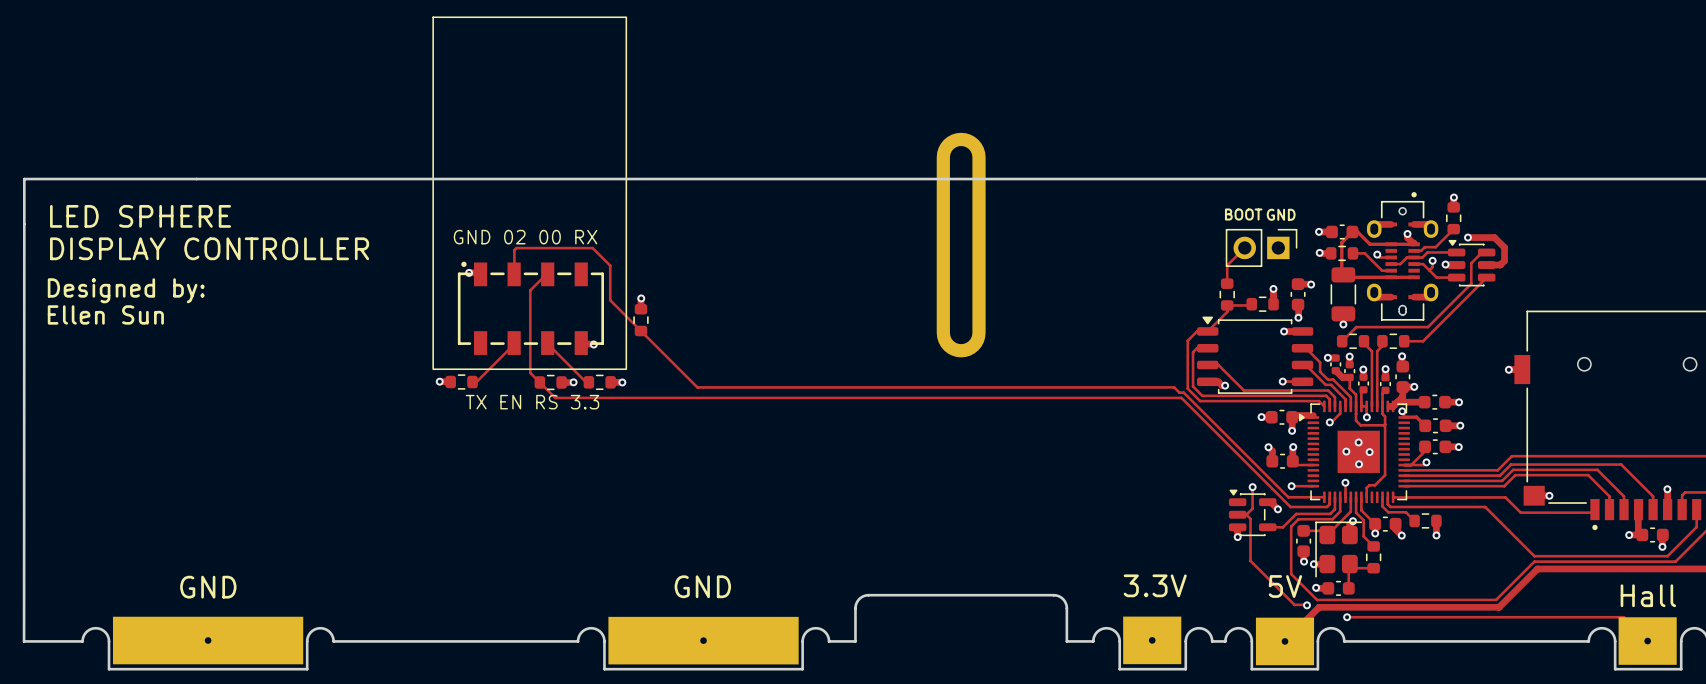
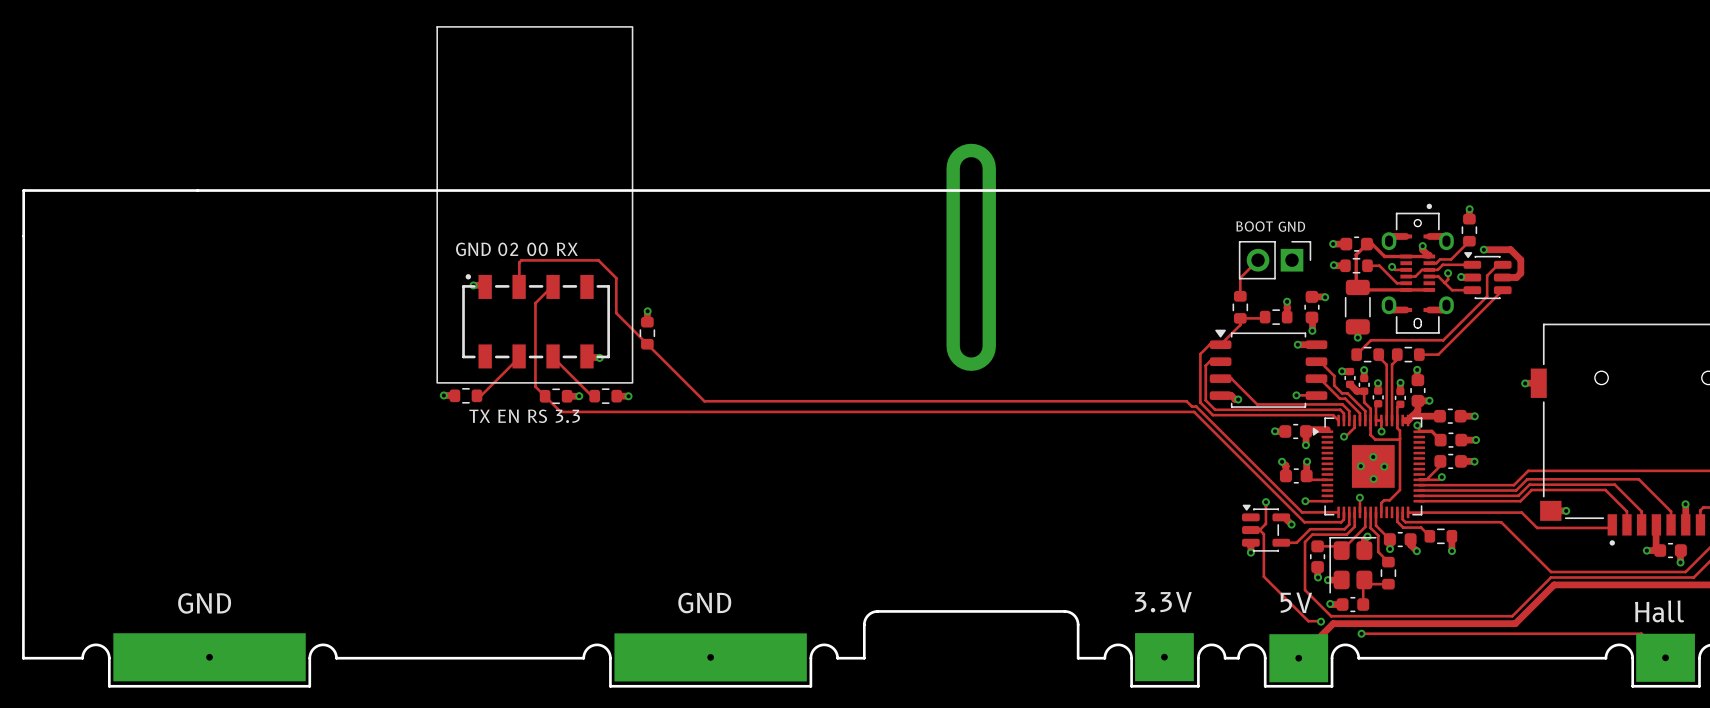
text: LED SPHERE (140, 216) -> none
text: DISPLAY CONTROLLER (209, 248) -> none
text: Designed by: (126, 290) -> none
text: Ellen Sun (105, 314) -> none

